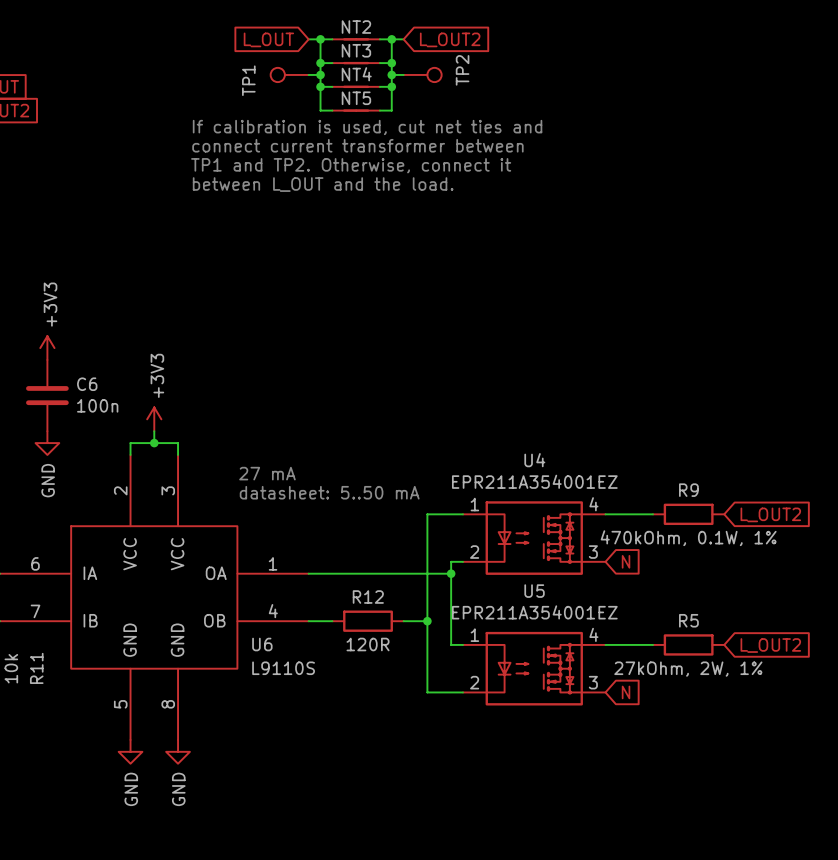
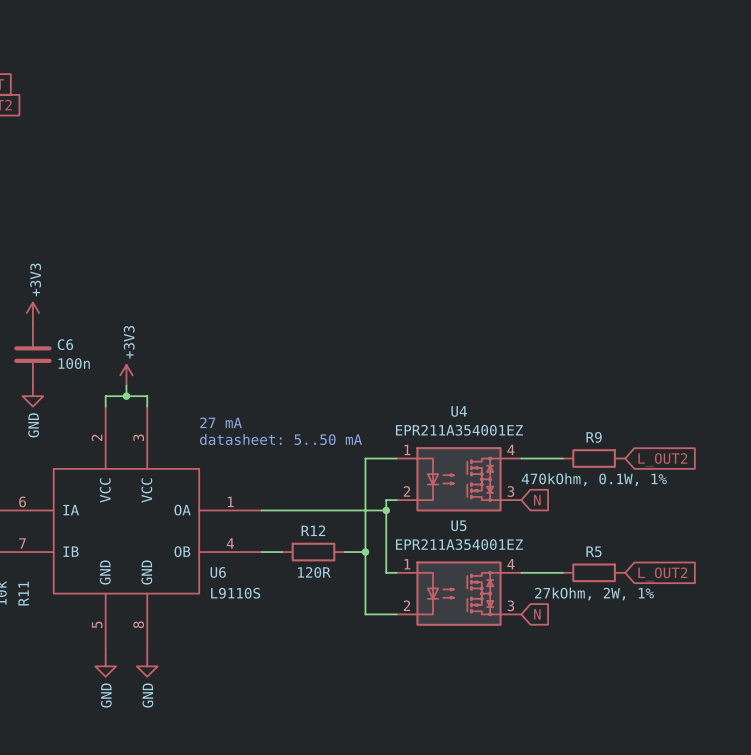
global label: L_OUT (268, 39) -> none
wire: (308, 39) (332, 39) -> none
wire: (320, 39) (320, 110) (332, 110) -> none
junction: (320, 39) -> none
NT2: (356, 39) -> none
wire: (379, 39) (403, 39) -> none
wire: (391, 39) (391, 110) (379, 110) -> none
junction: (391, 39) -> none
global label: L_OUT2 (450, 39) -> none
wire: (320, 63) (332, 63) -> none
junction: (320, 63) -> none
NT3: (356, 63) -> none
wire: (379, 63) (391, 63) -> none
junction: (391, 63) -> none
TP1: (289, 74) -> none
wire: (308, 74) (320, 74) -> none
junction: (320, 74) -> none
wire: (391, 74) (403, 74) -> none
junction: (391, 74) -> none
TP2: (422, 74) -> none
wire: (320, 86) (332, 86) -> none
junction: (320, 86) -> none
NT4: (356, 86) -> none
wire: (379, 86) (391, 86) -> none
junction: (391, 86) -> none
NT5: (356, 110) -> none
text: If calibration is used, cut net ties and (367, 127) -> none
text: connect current transformer between (357, 145) -> none
text: TP1 and TP2. Otherwise, connect it (351, 165) -> none
text: between L_OUT and the load. (323, 184) -> none

